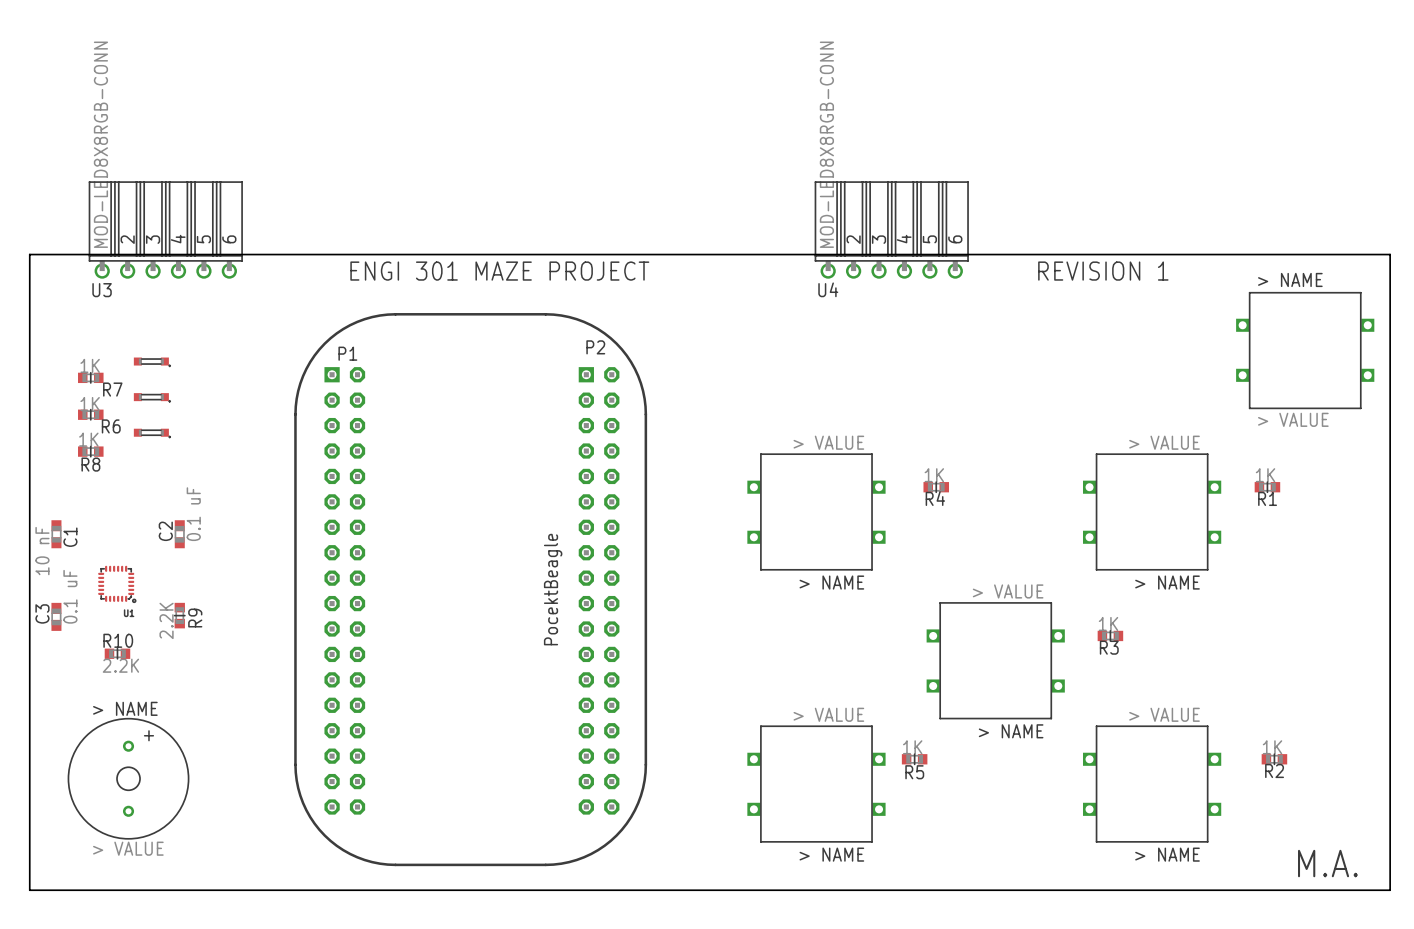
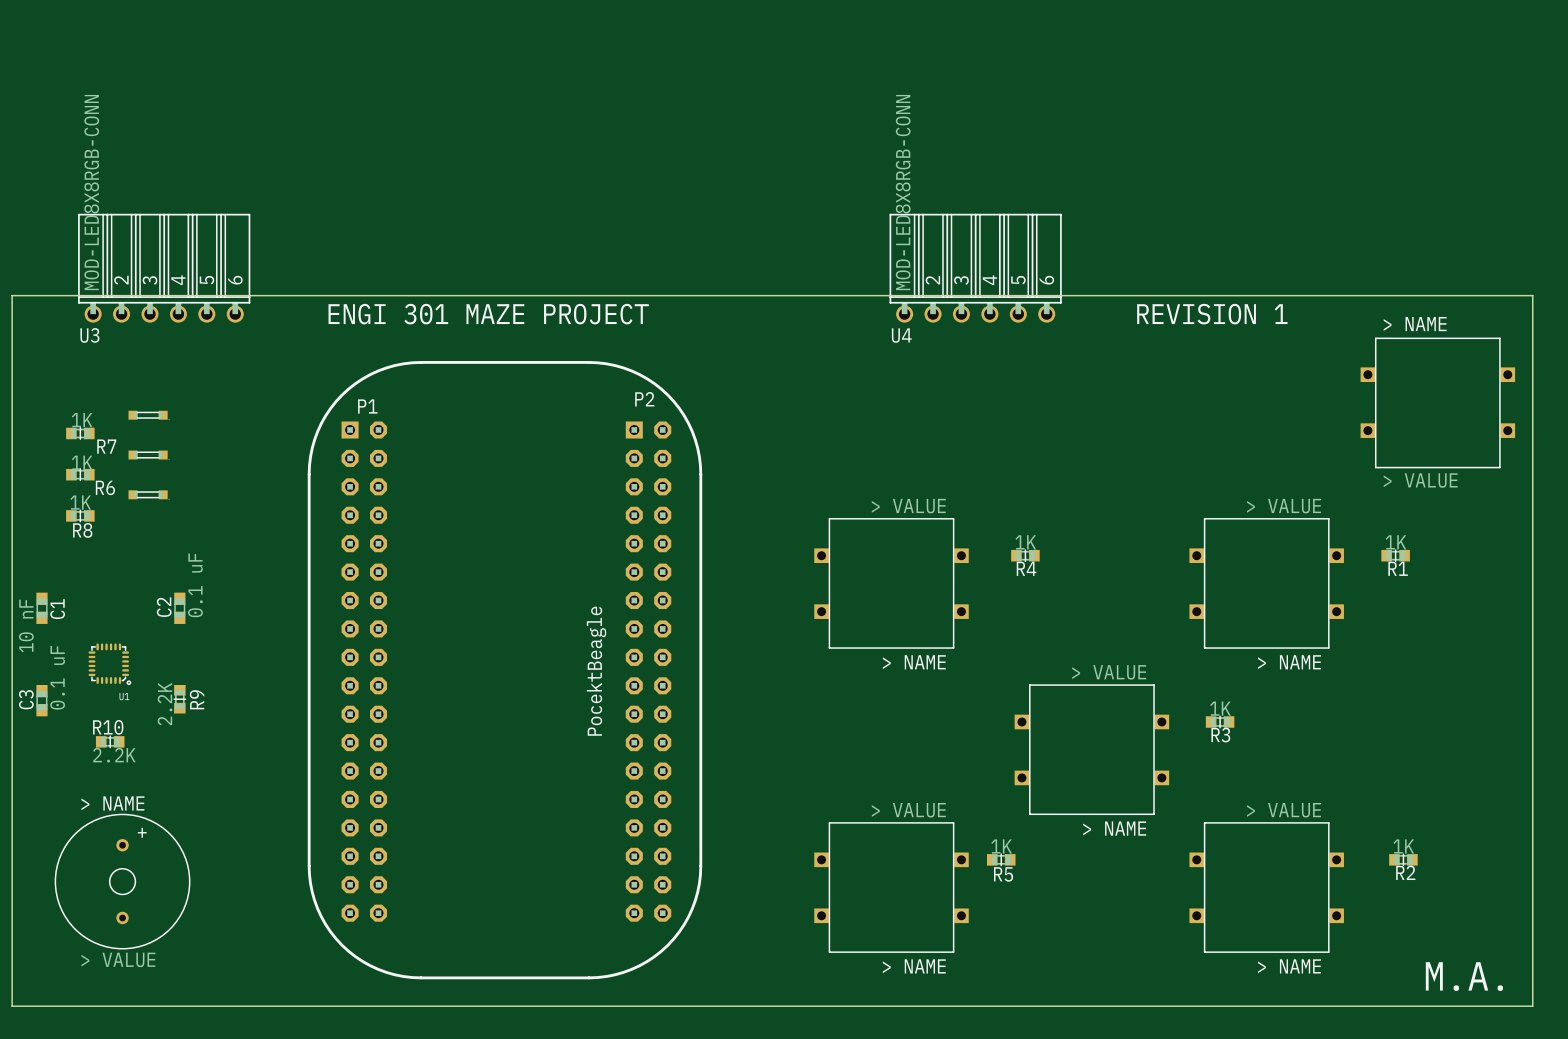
text position: ENGI 301 MAZE PROJECT (499, 271) -> ENGI 301 MAZE PROJECT (488, 314)

